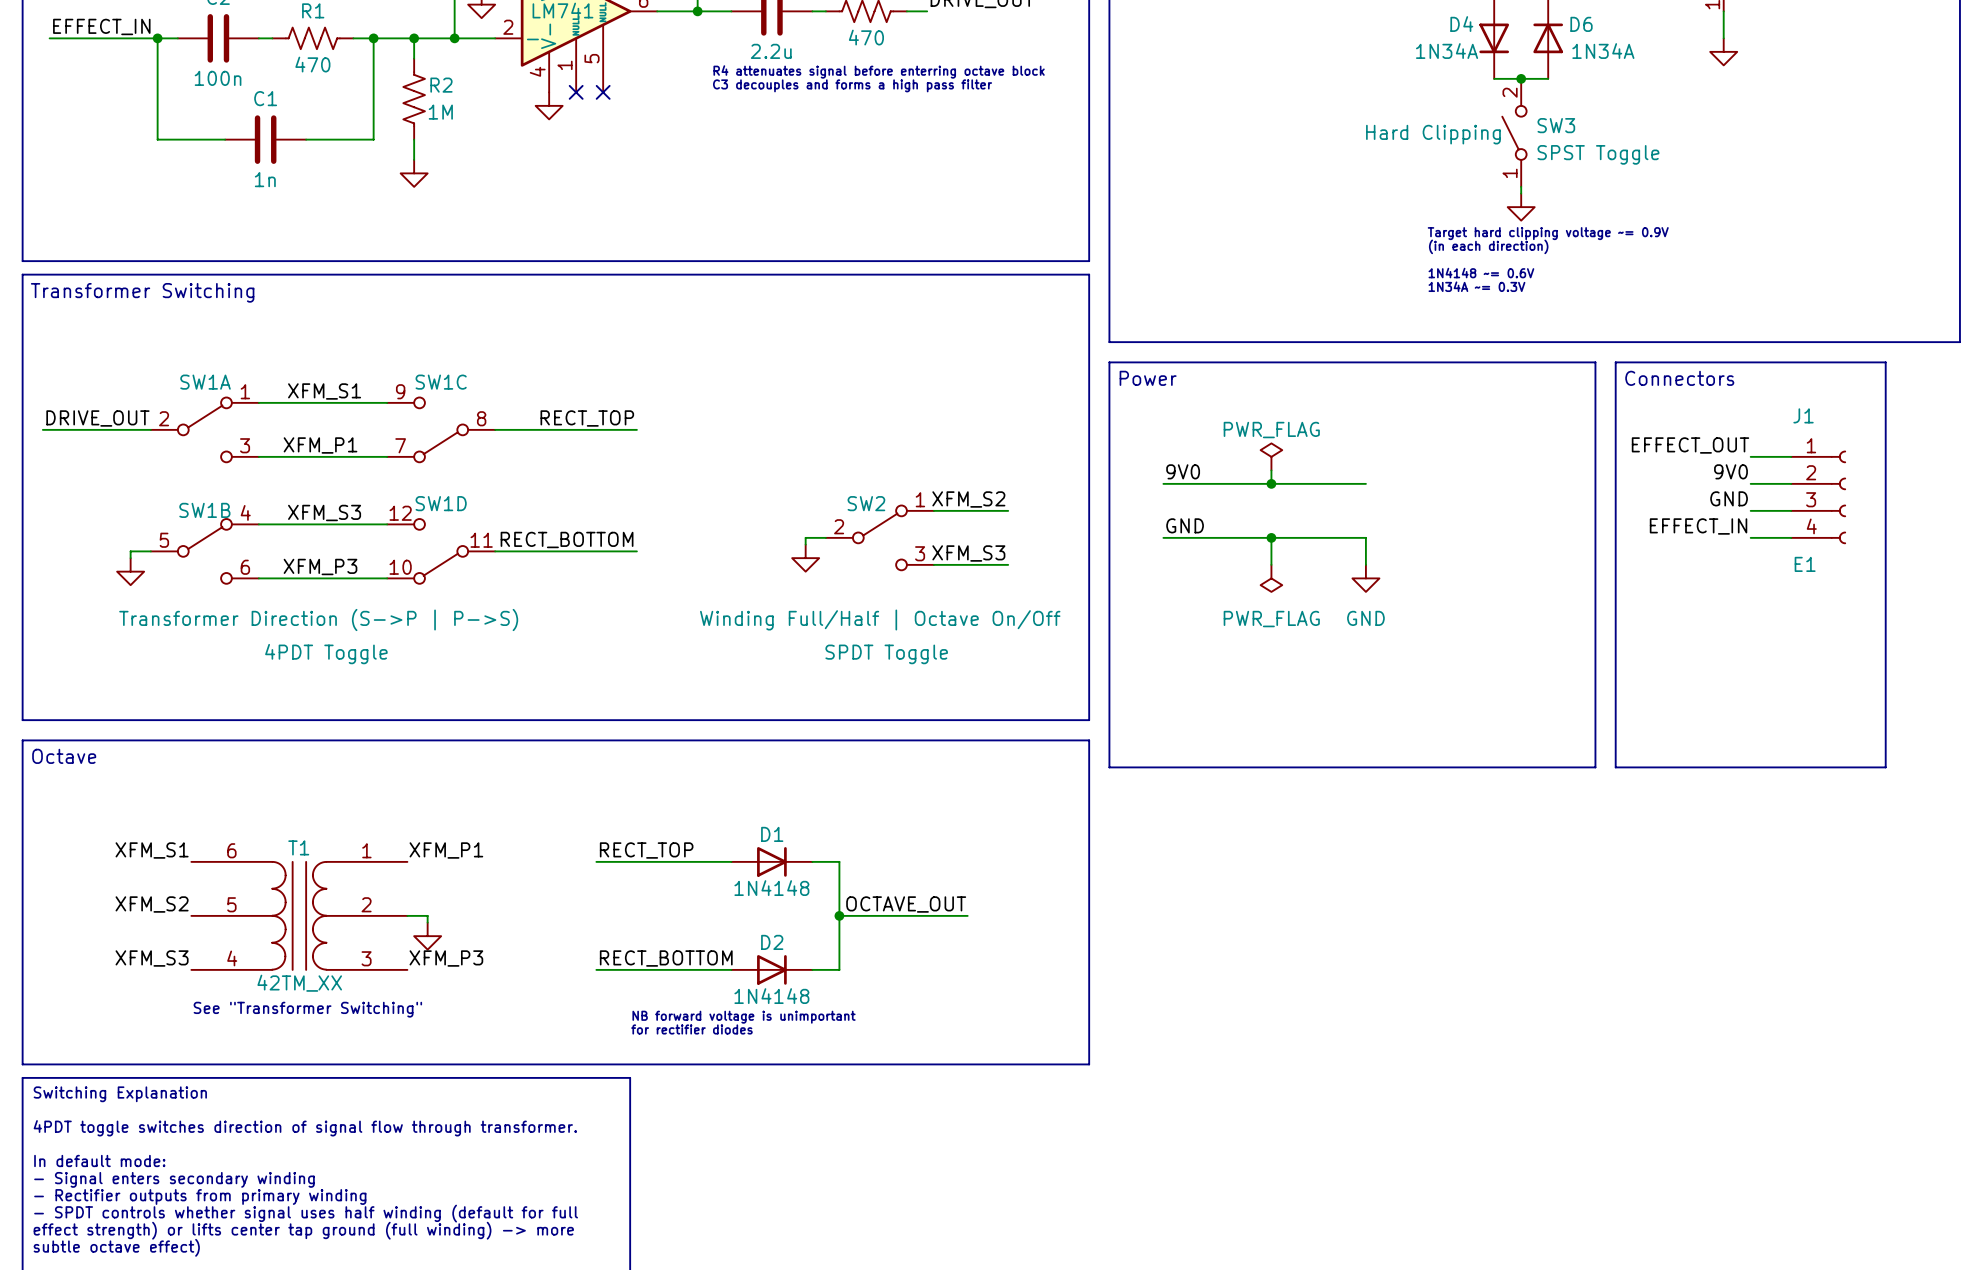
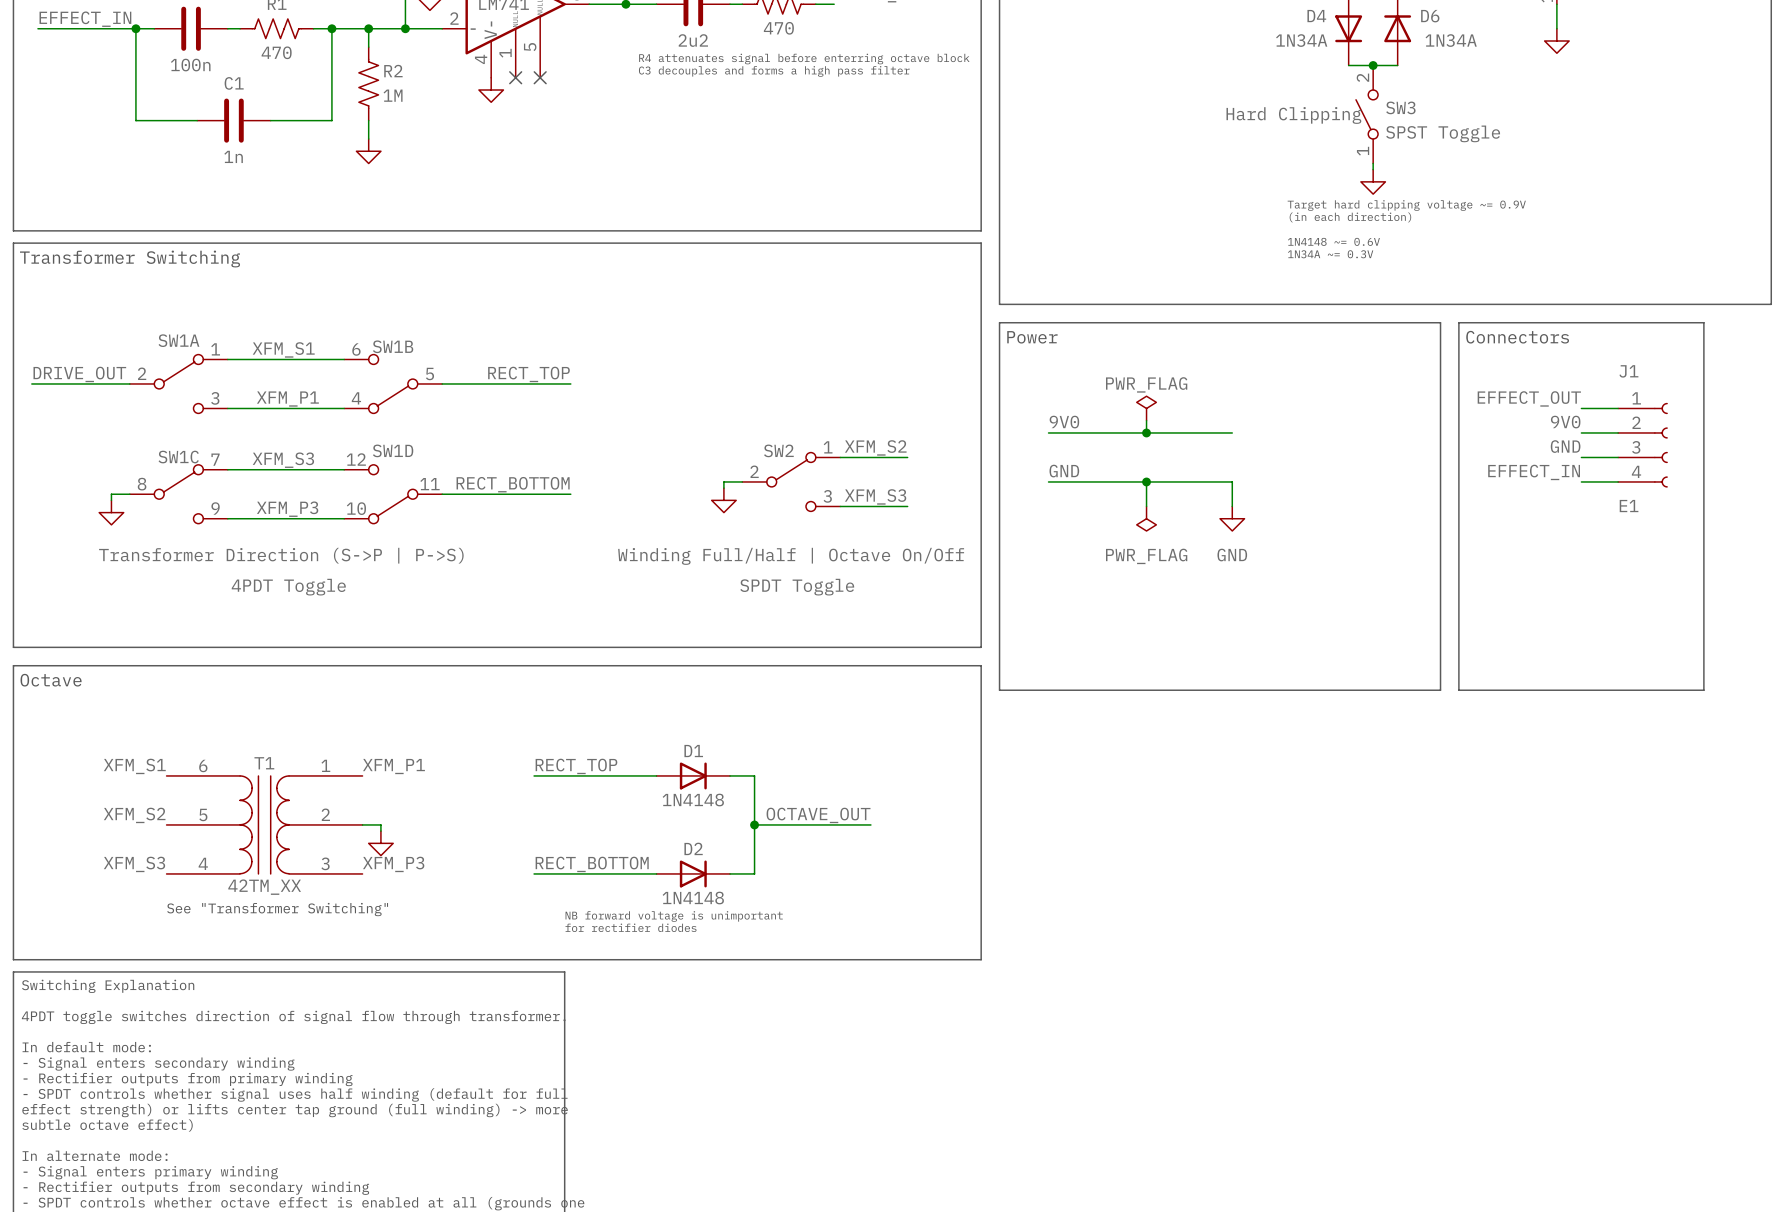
part value: 2.2u (771, 51) -> 2u2 (693, 40)
SW1C rotation: 0° (441, 429) -> 180° (178, 494)
SW1C position: (441, 429) -> (178, 494)
SW1B rotation: 0° (204, 551) -> 180° (393, 383)
SW1B position: (204, 551) -> (393, 383)

